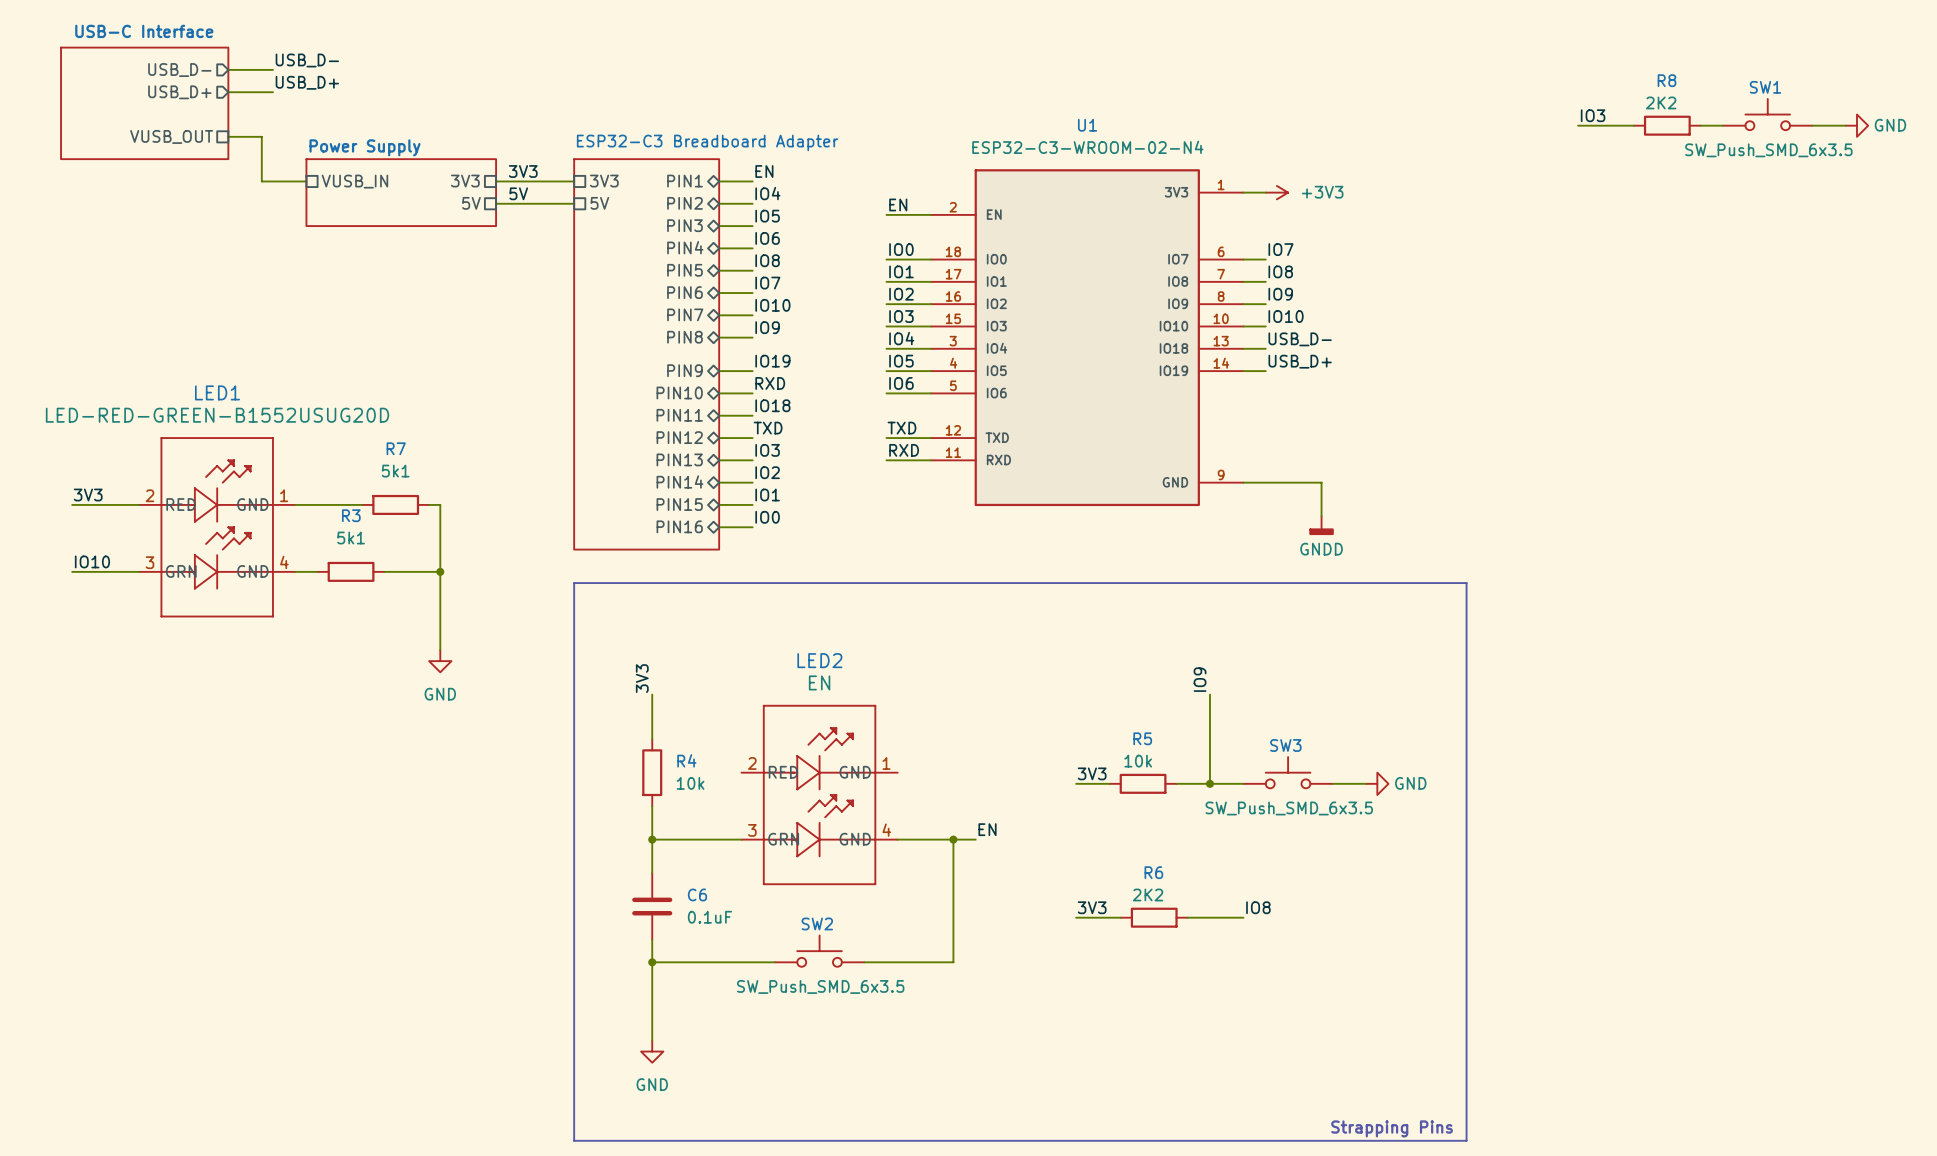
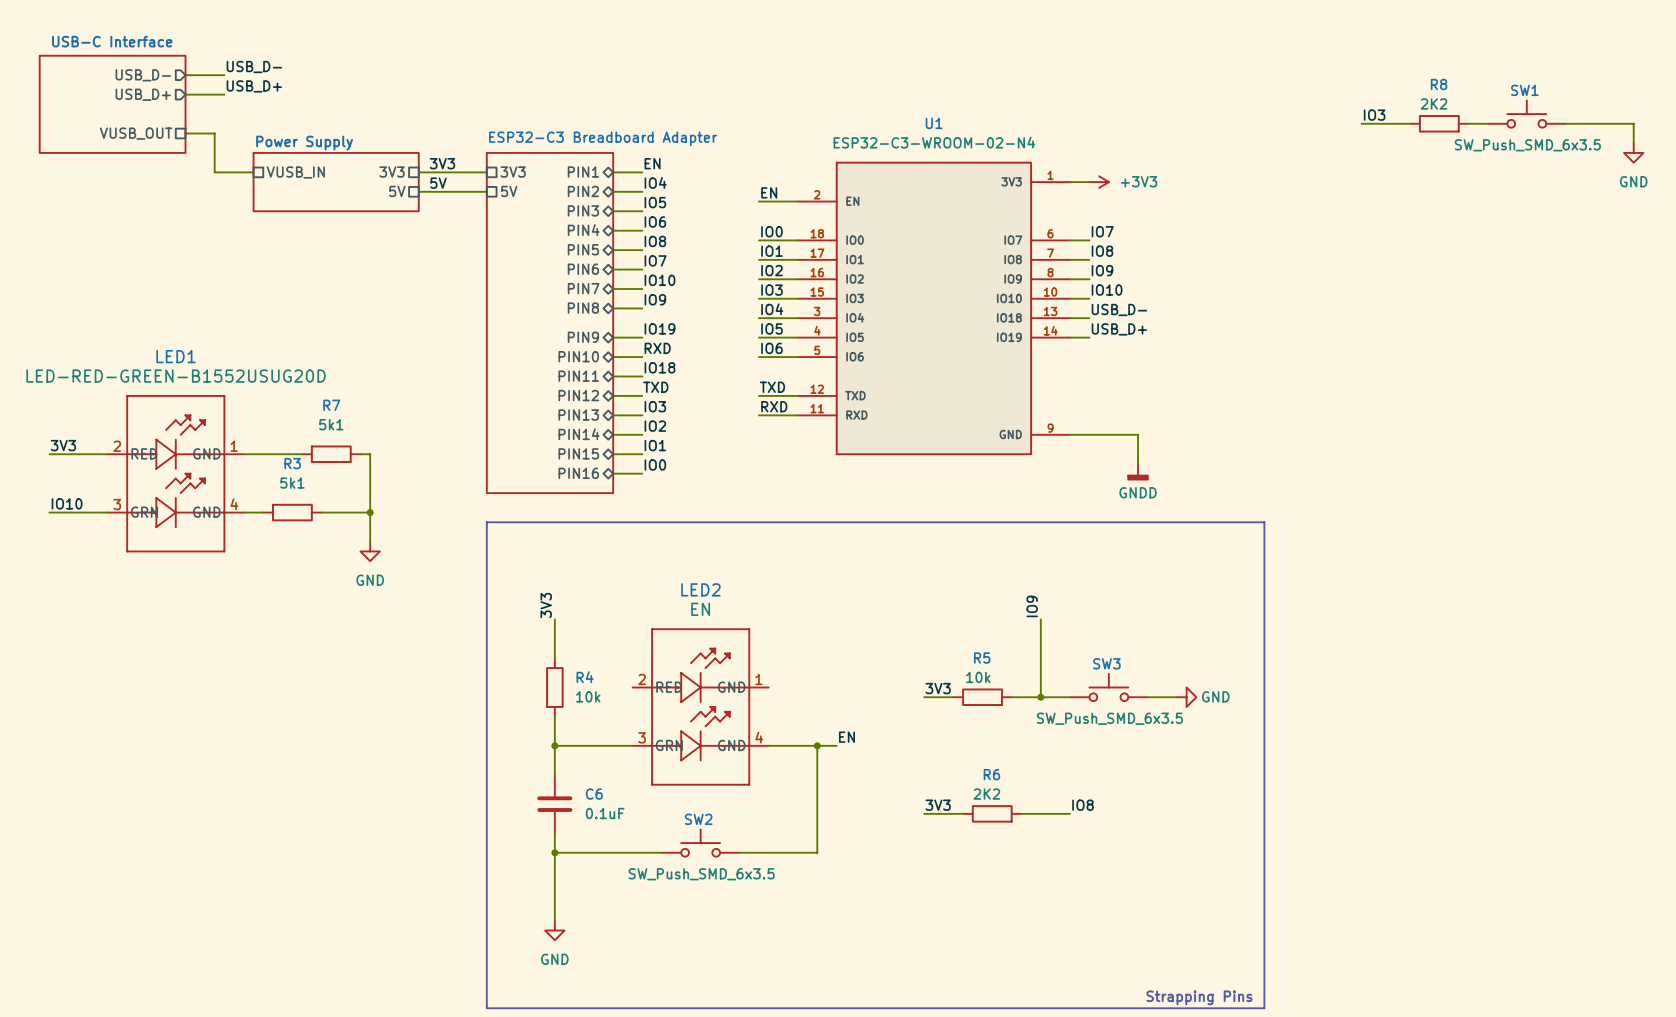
wire: none -> (1594, 123) (1633, 123) (1633, 143)
power symbol rotation: 0° (1856, 125) -> 90° clockwise (1633, 152)
power symbol position: GND (1856, 125) -> GND (1633, 152)
wire: (440, 605) (440, 649) -> none
power symbol position: GND (440, 661) -> GND (370, 551)

